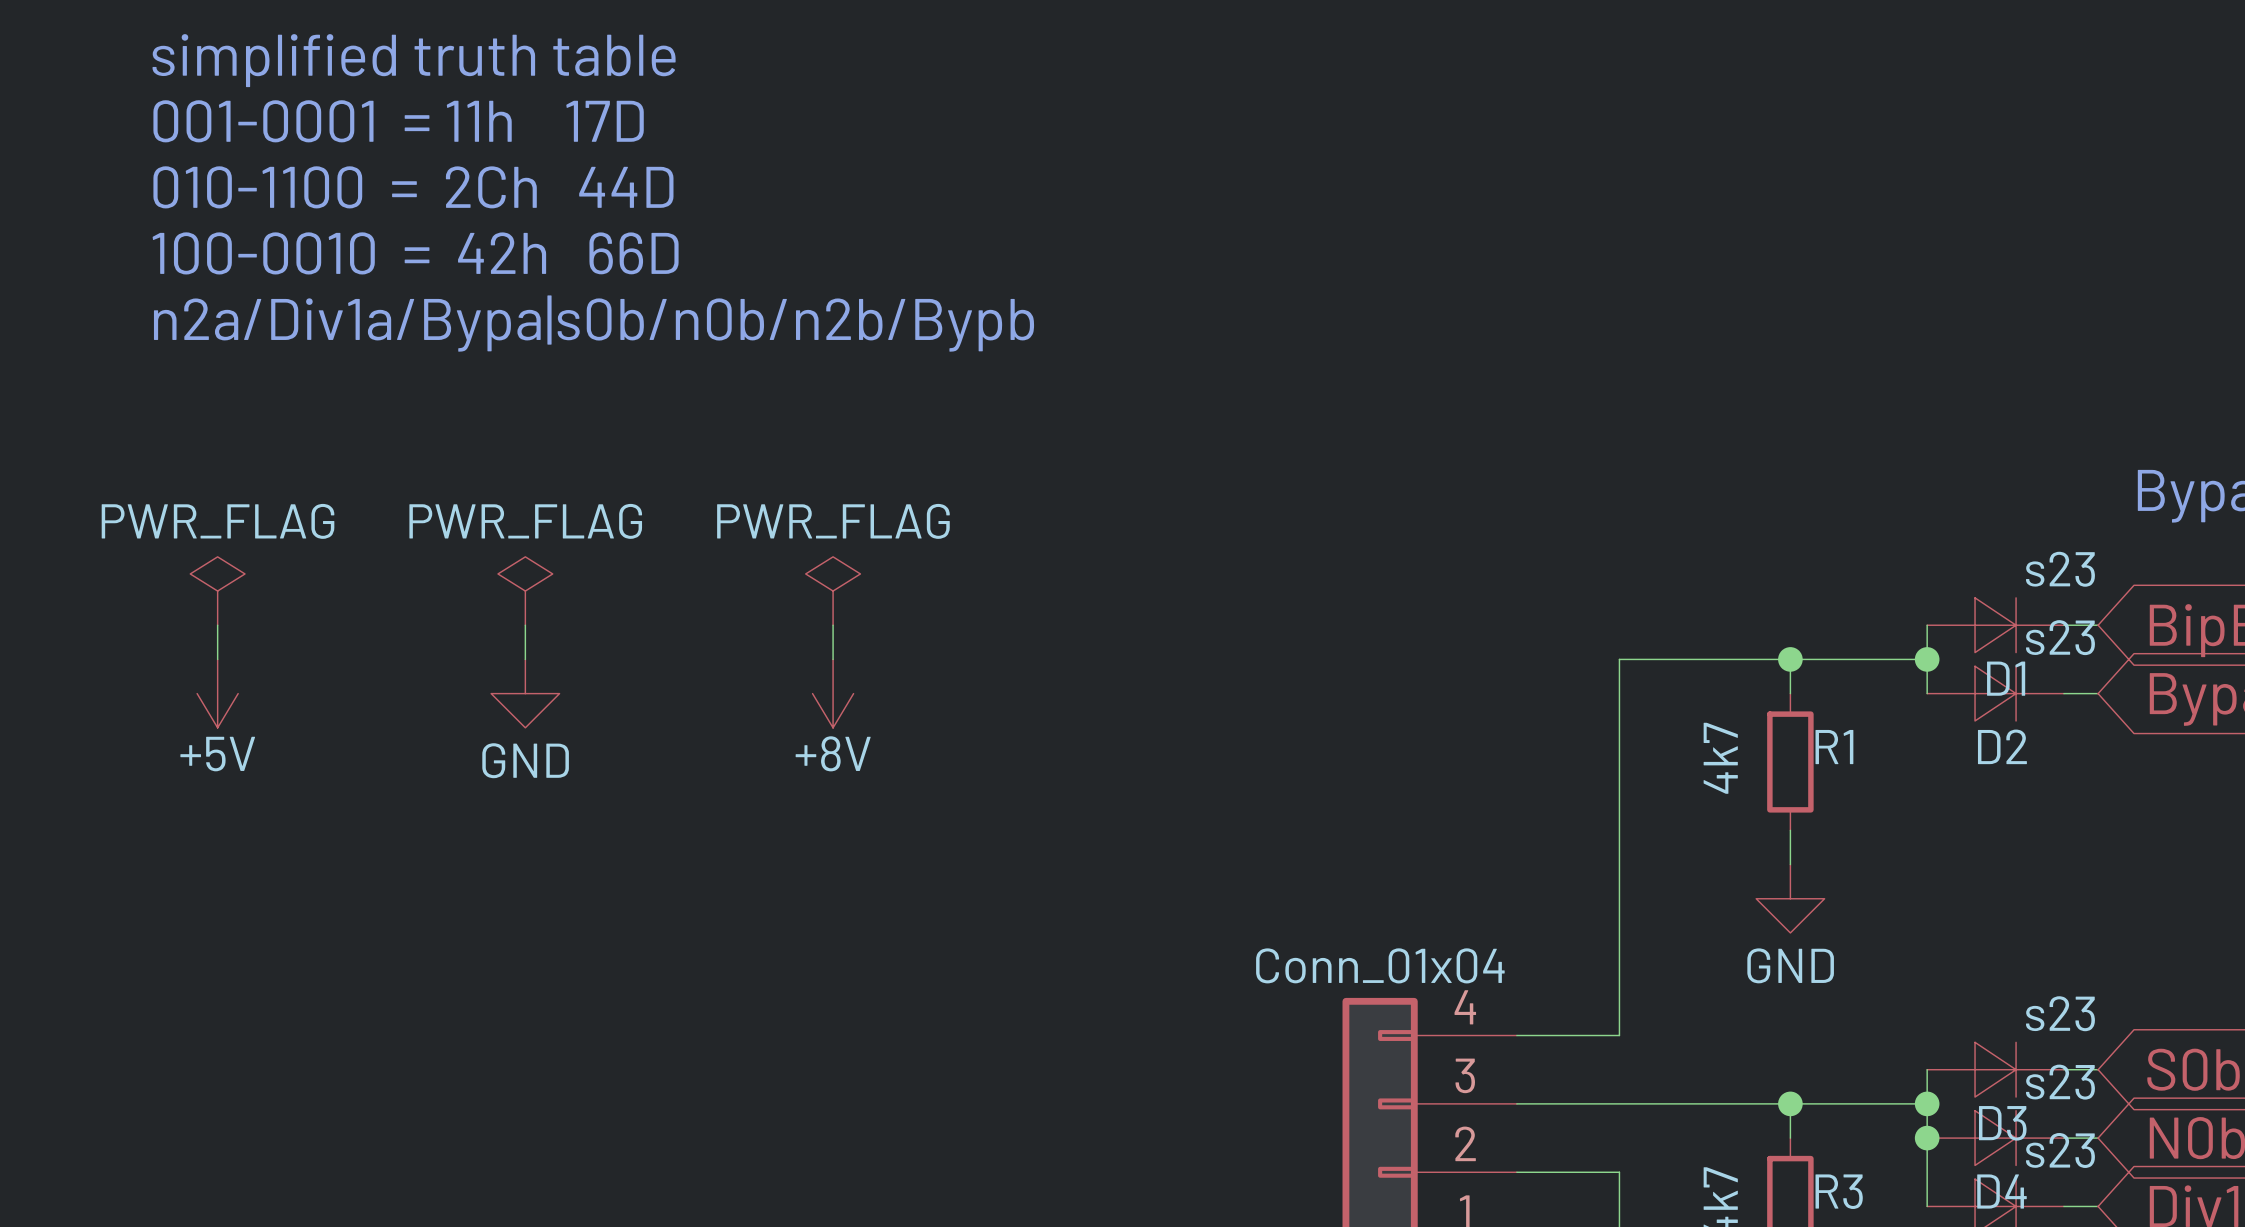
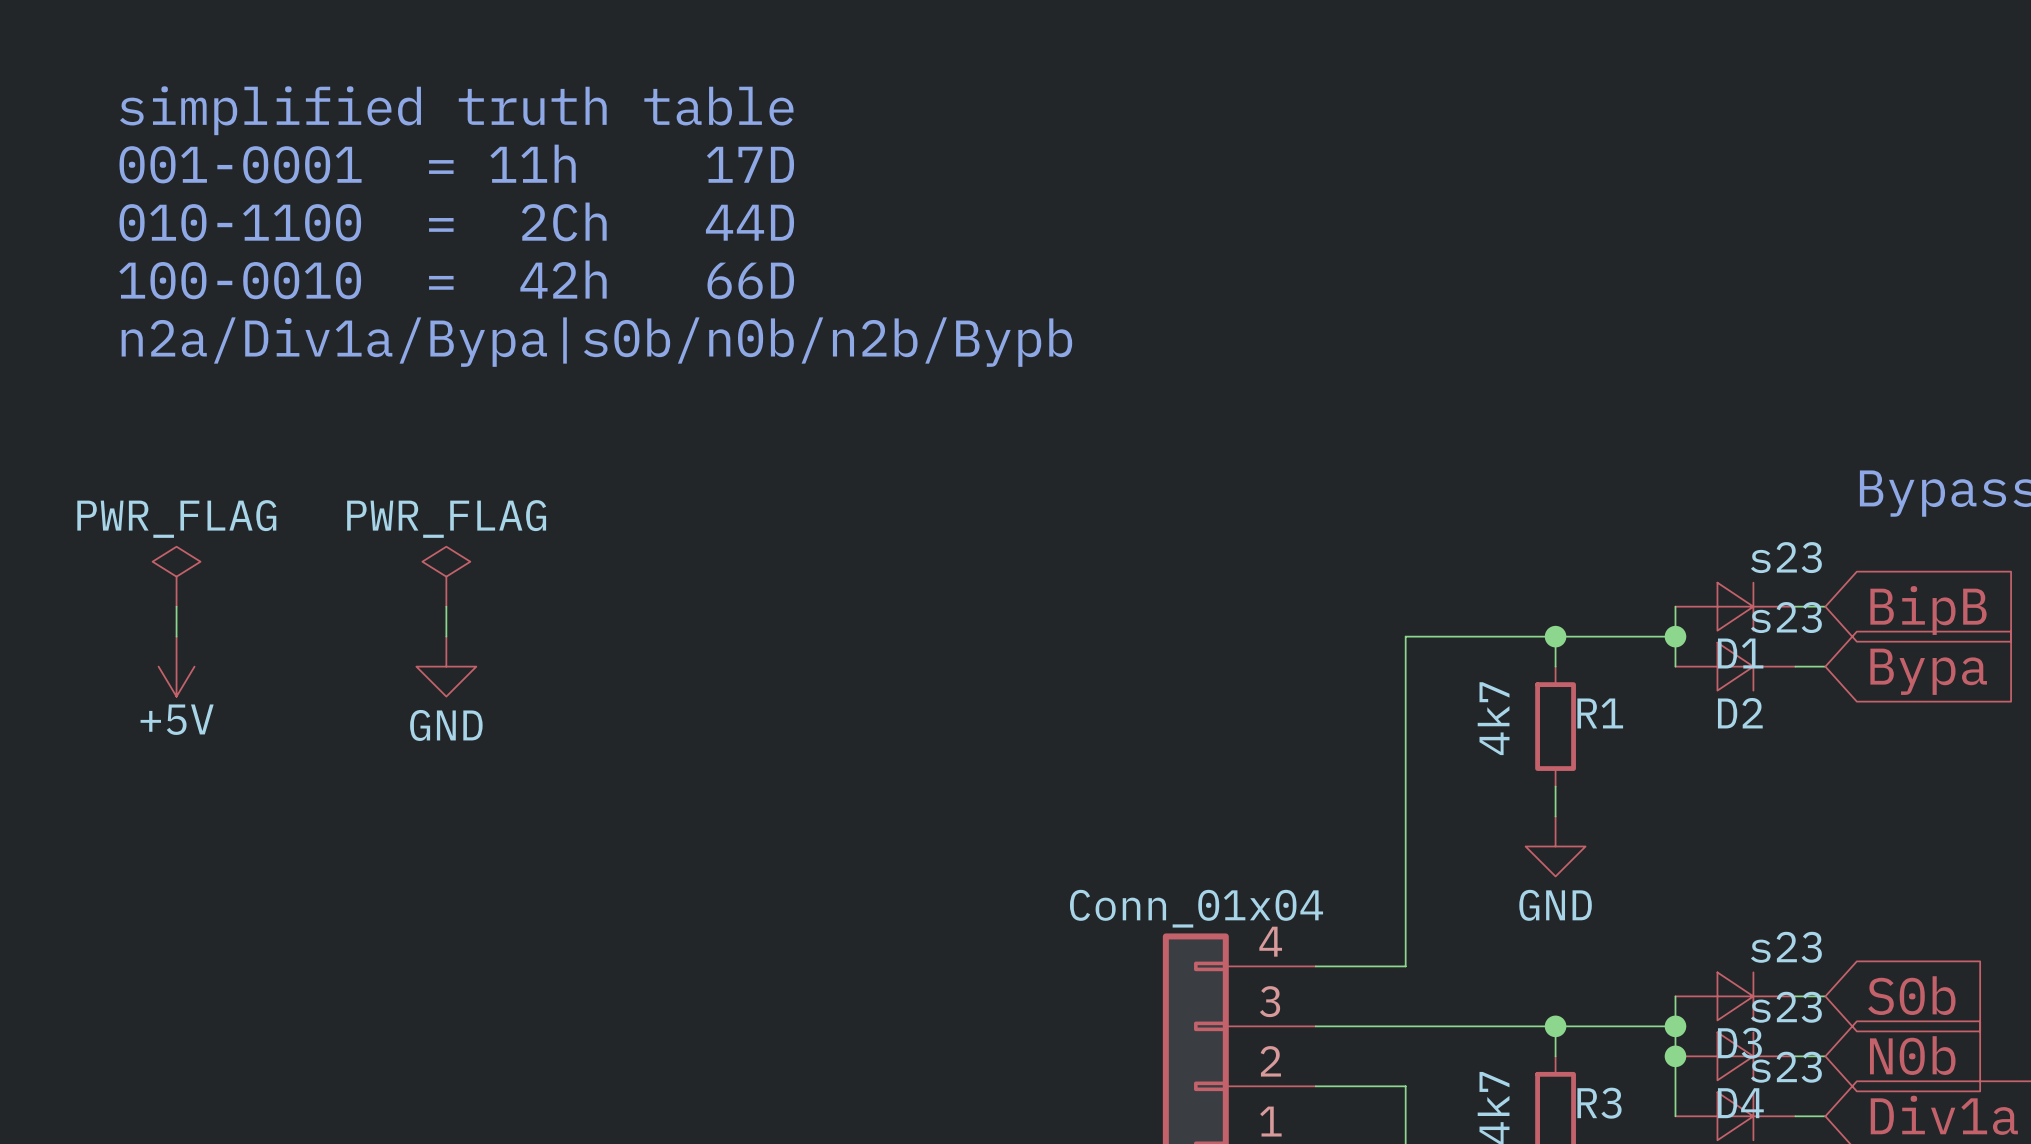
power symbol: PWR_FLAG (833, 591) -> none
wire: (833, 625) (833, 659) -> none
power symbol: +8V (833, 693) -> none

